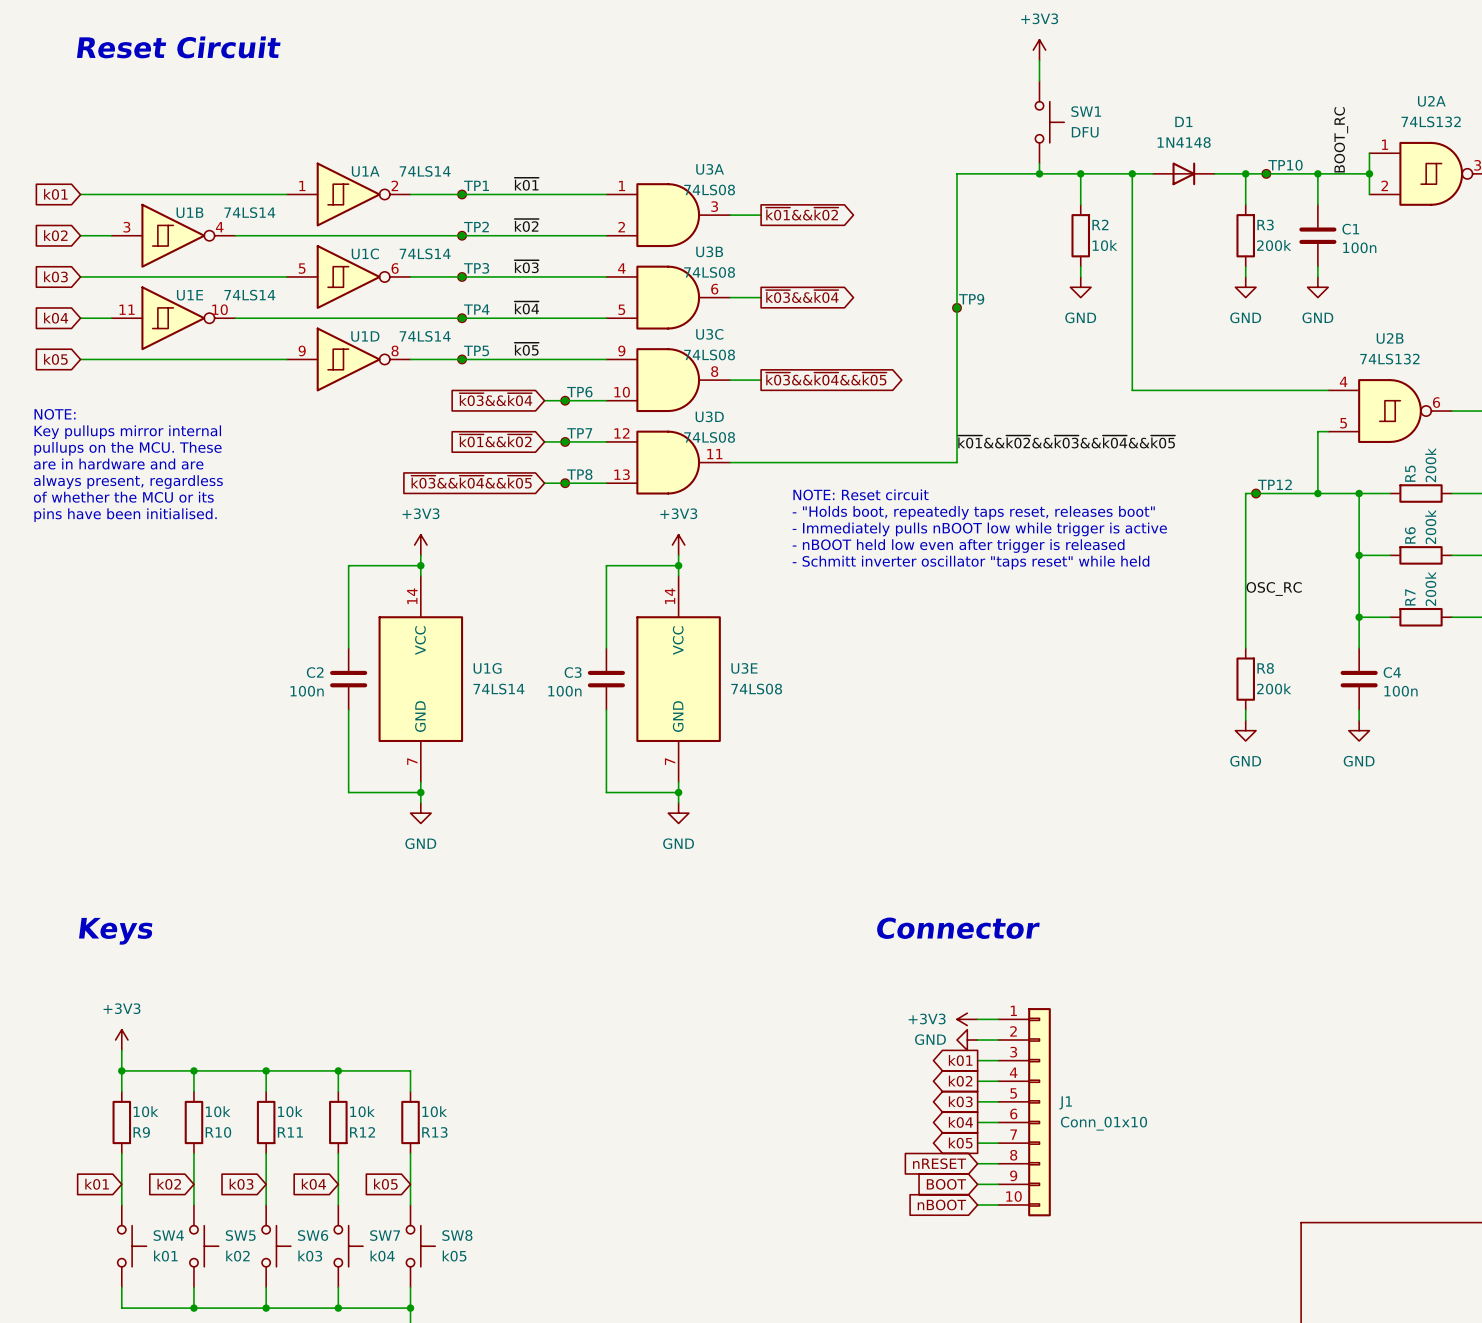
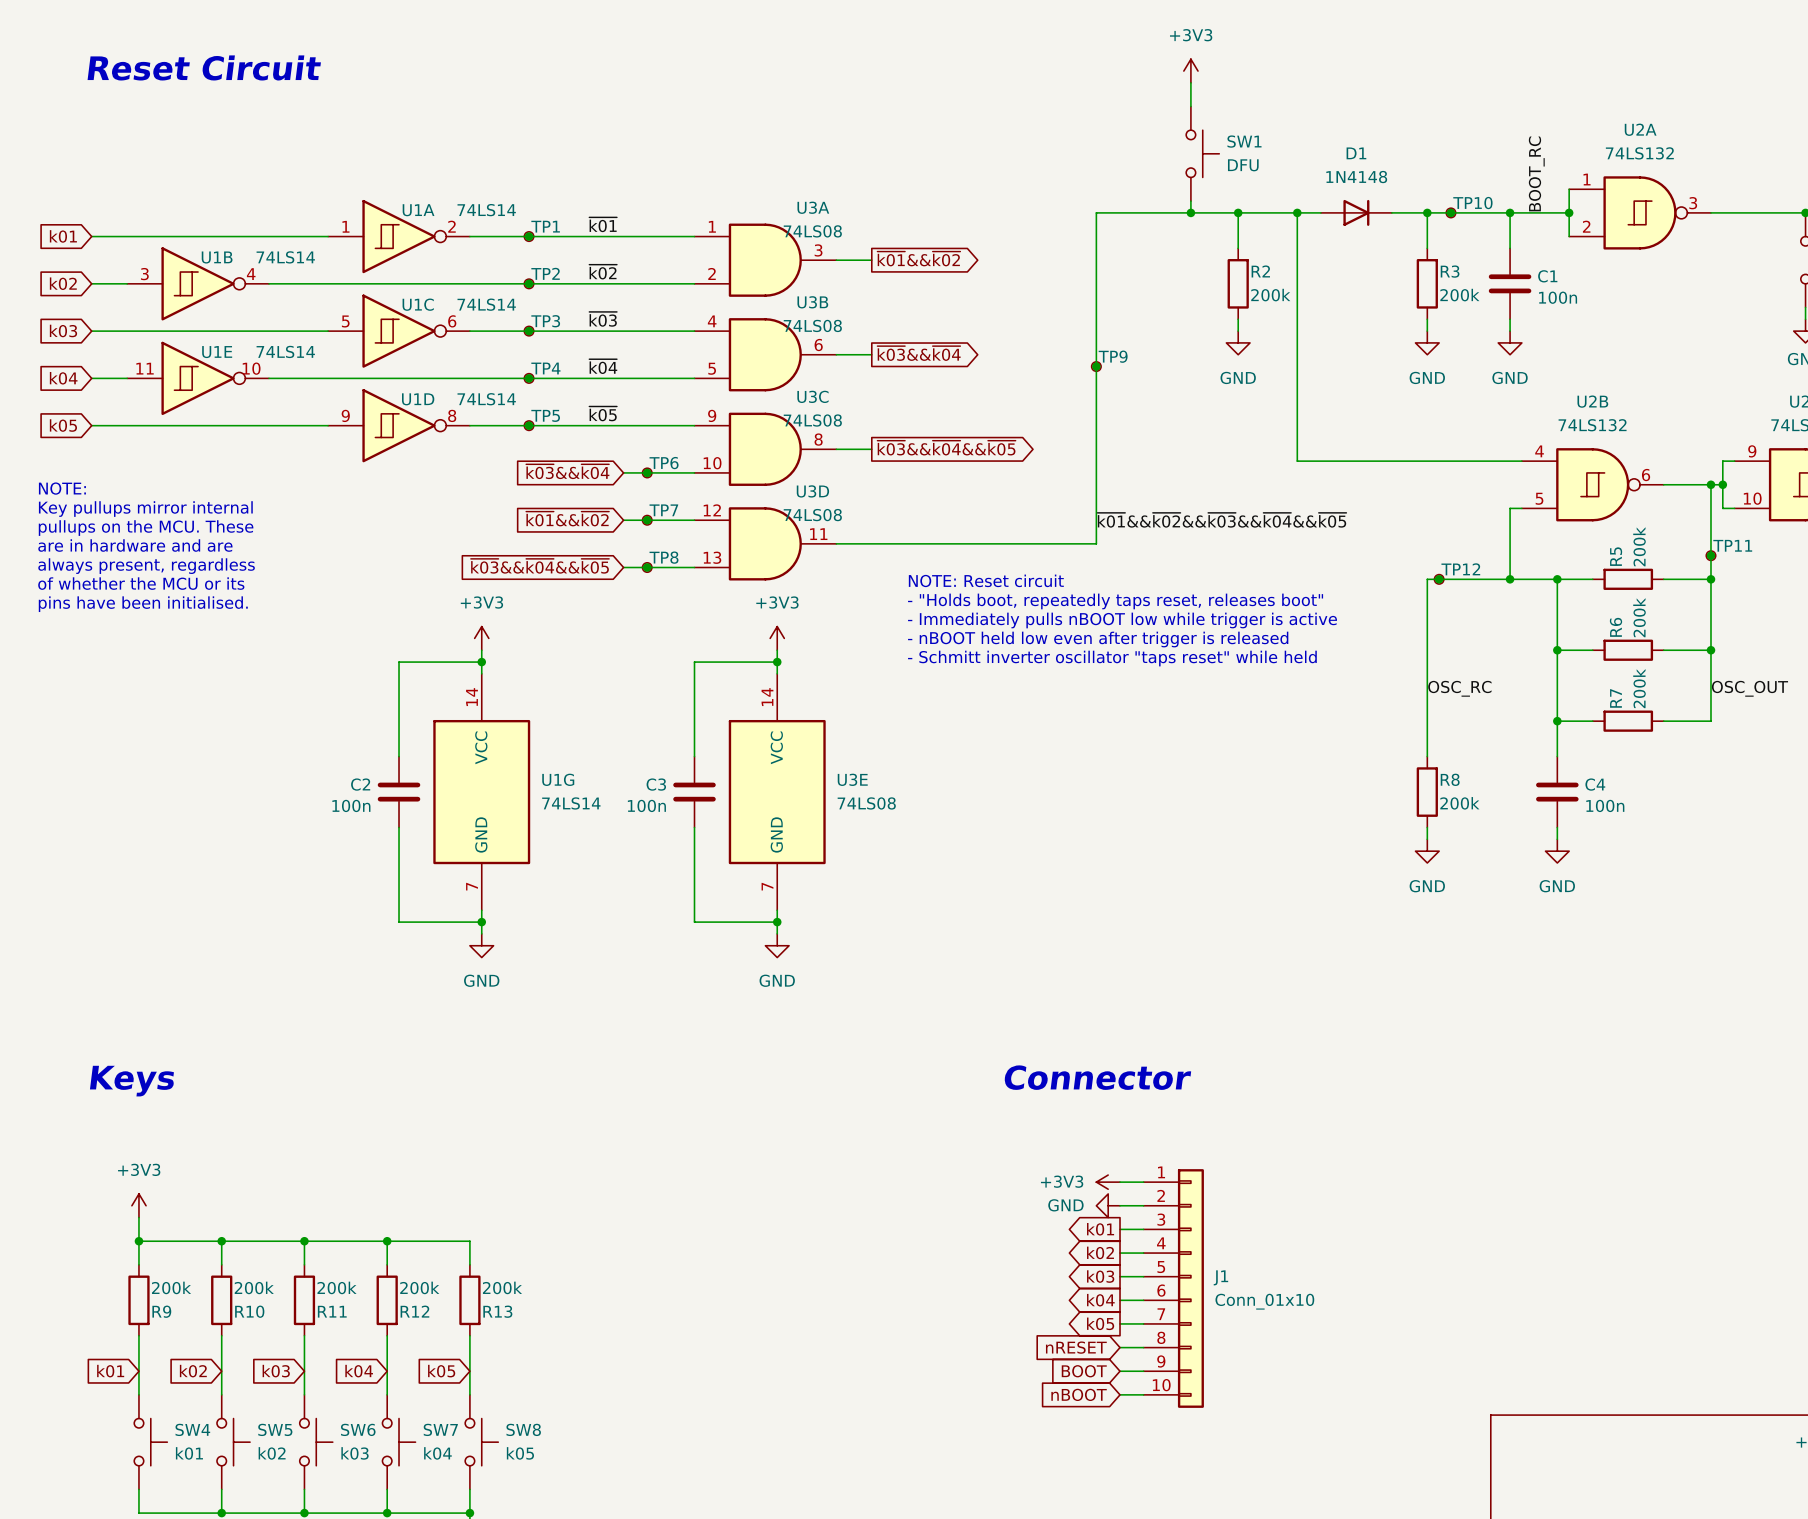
R2 value: 10k (1104, 245) -> 200k (1270, 295)
R9 value: 10k (145, 1111) -> 200k (171, 1287)
R10 value: 10k (218, 1111) -> 200k (254, 1287)
R11 value: 10k (290, 1111) -> 200k (337, 1287)
R12 value: 10k (362, 1111) -> 200k (419, 1287)
R13 value: 10k (434, 1111) -> 200k (502, 1287)

